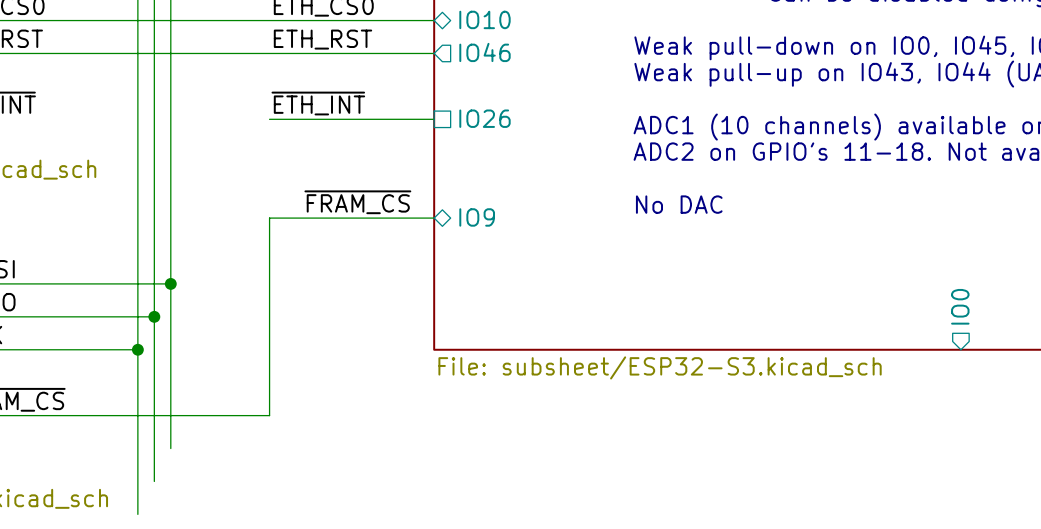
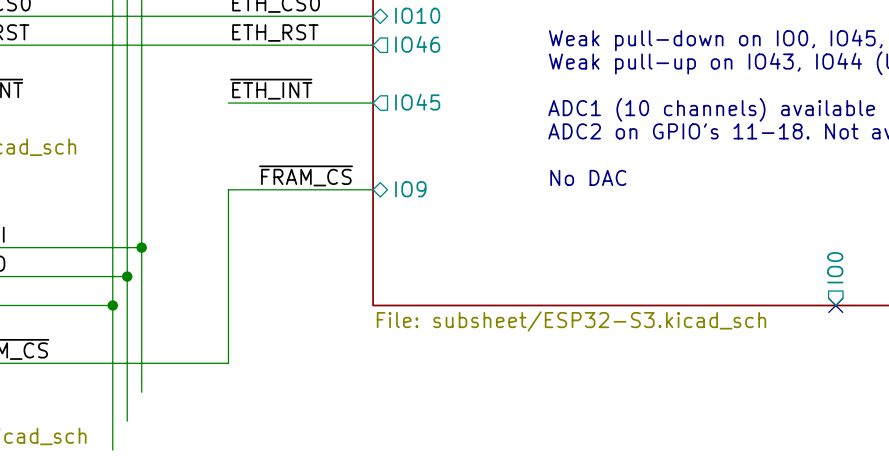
sheet pin shape: passive (484, 118) -> output (417, 102)
sheet pin: IO26 (484, 118) -> IO45 (417, 102)
no-connect mark: none -> (835, 305)

